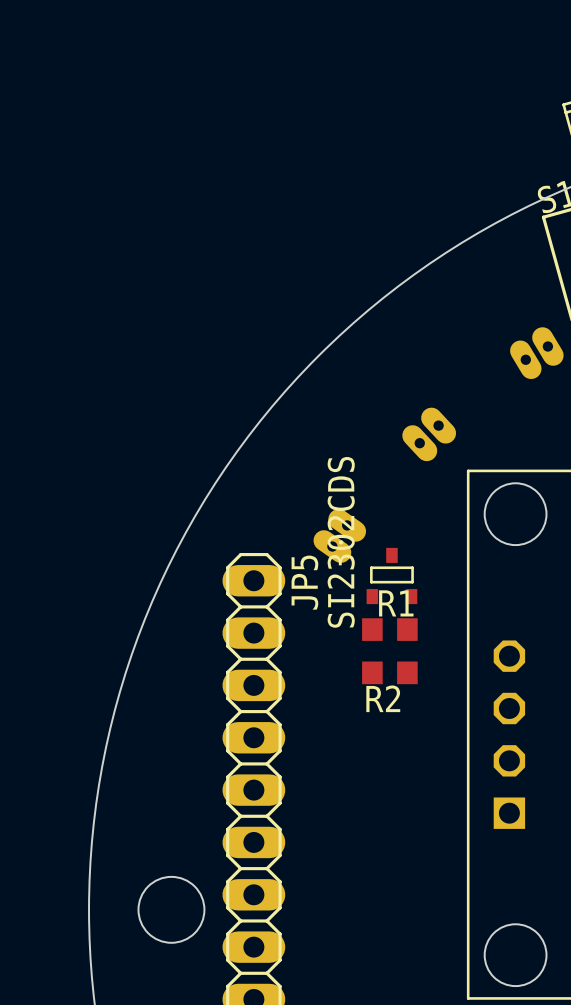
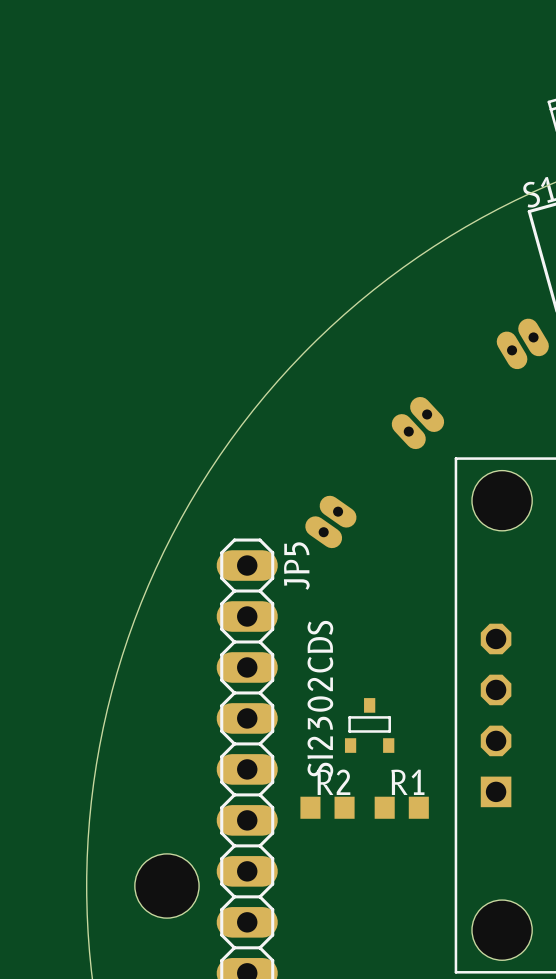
SI2302CDS position: (391, 576) -> (369, 725)
R1 position: (389, 629) -> (401, 807)
R2 position: (389, 672) -> (327, 807)
R2 name position: R2 (383, 698) -> R2 (333, 782)

